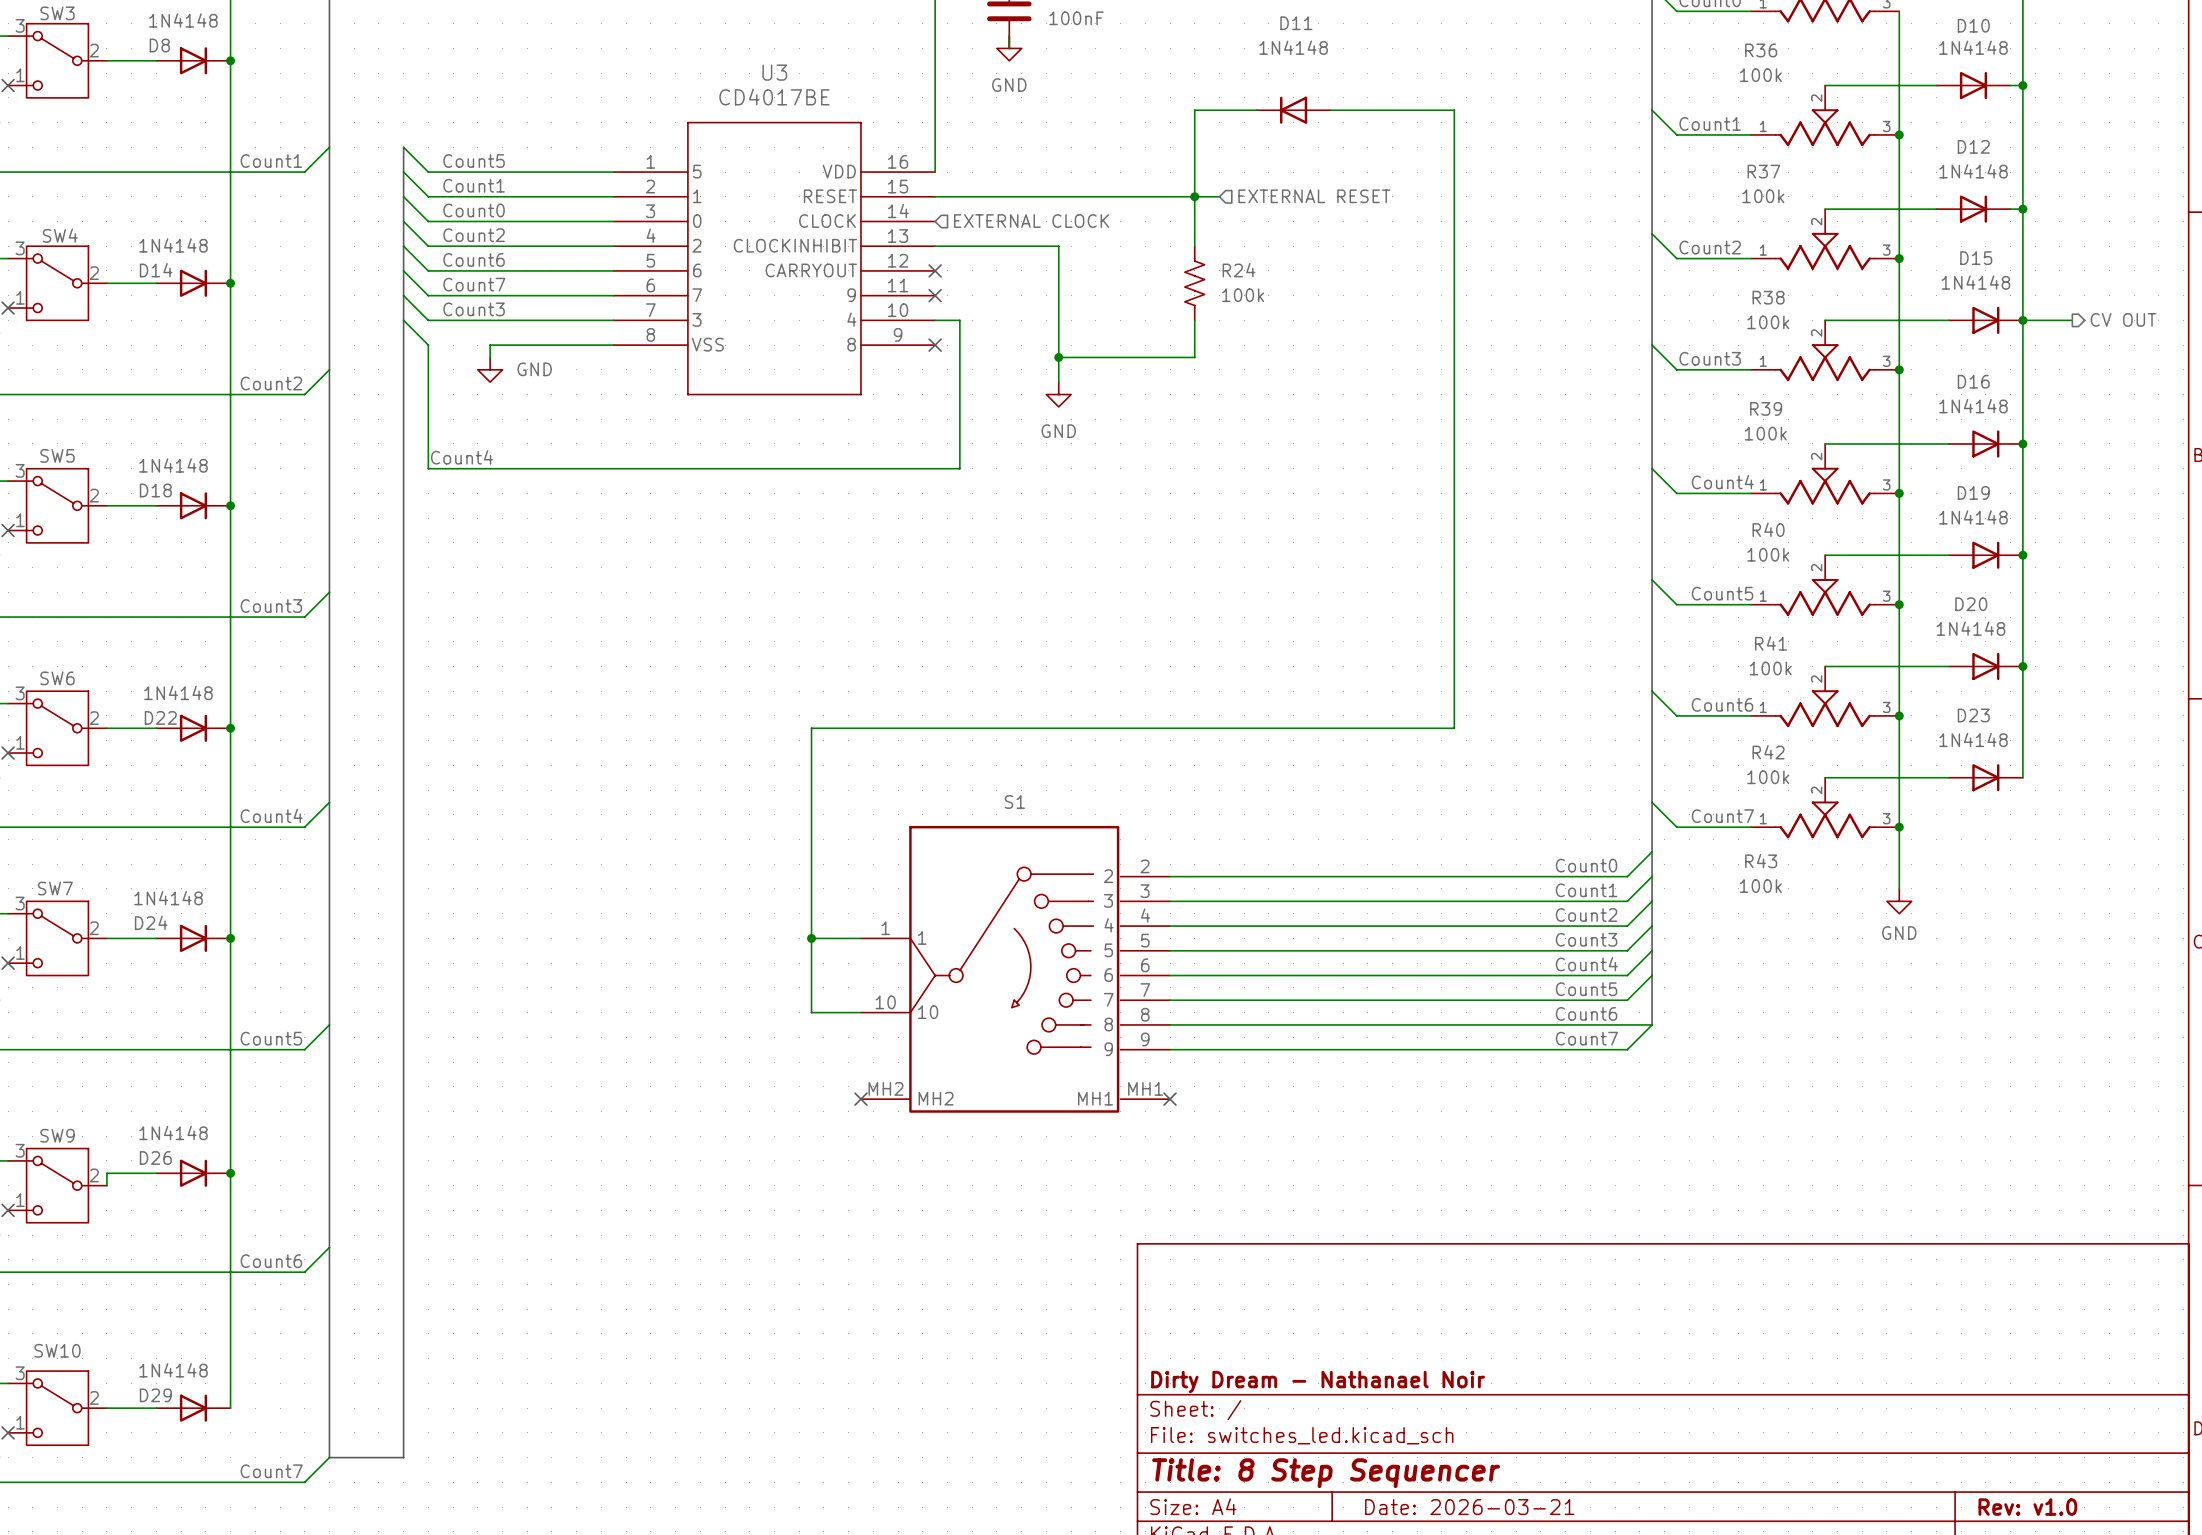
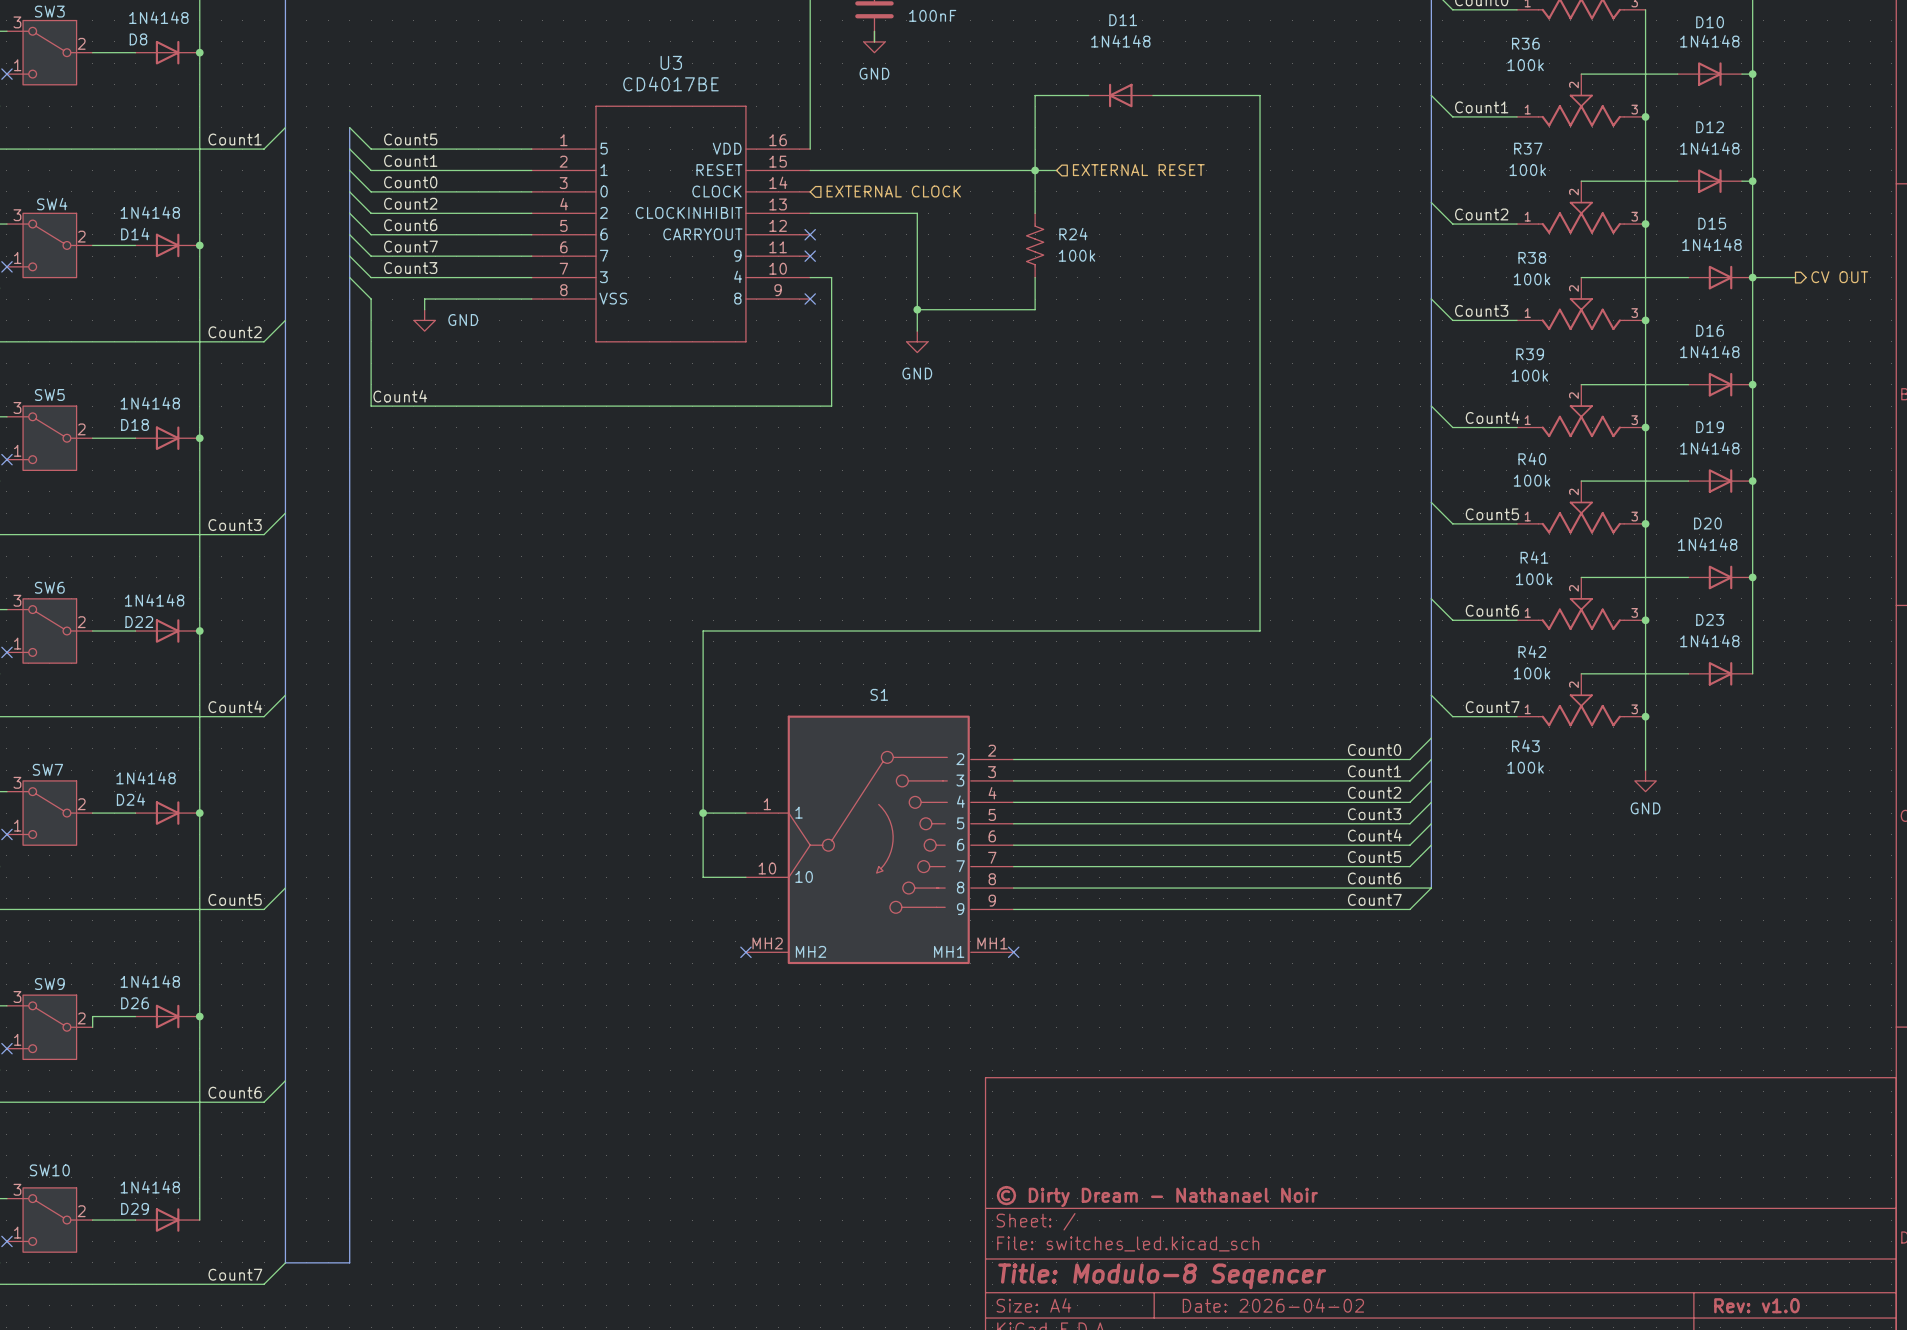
title block: Dirty Dream - Nathanael Noir (1318, 1382) -> © Dirty Dream - Nathanael Noir (1157, 1196)
title block: Title: 8 Step Sequencer (1326, 1473) -> Title: Modulo-8 Seqencer (1162, 1276)
title block: Date: 2026-03-21 (1469, 1507) -> Date: 2026-04-02 (1273, 1305)

